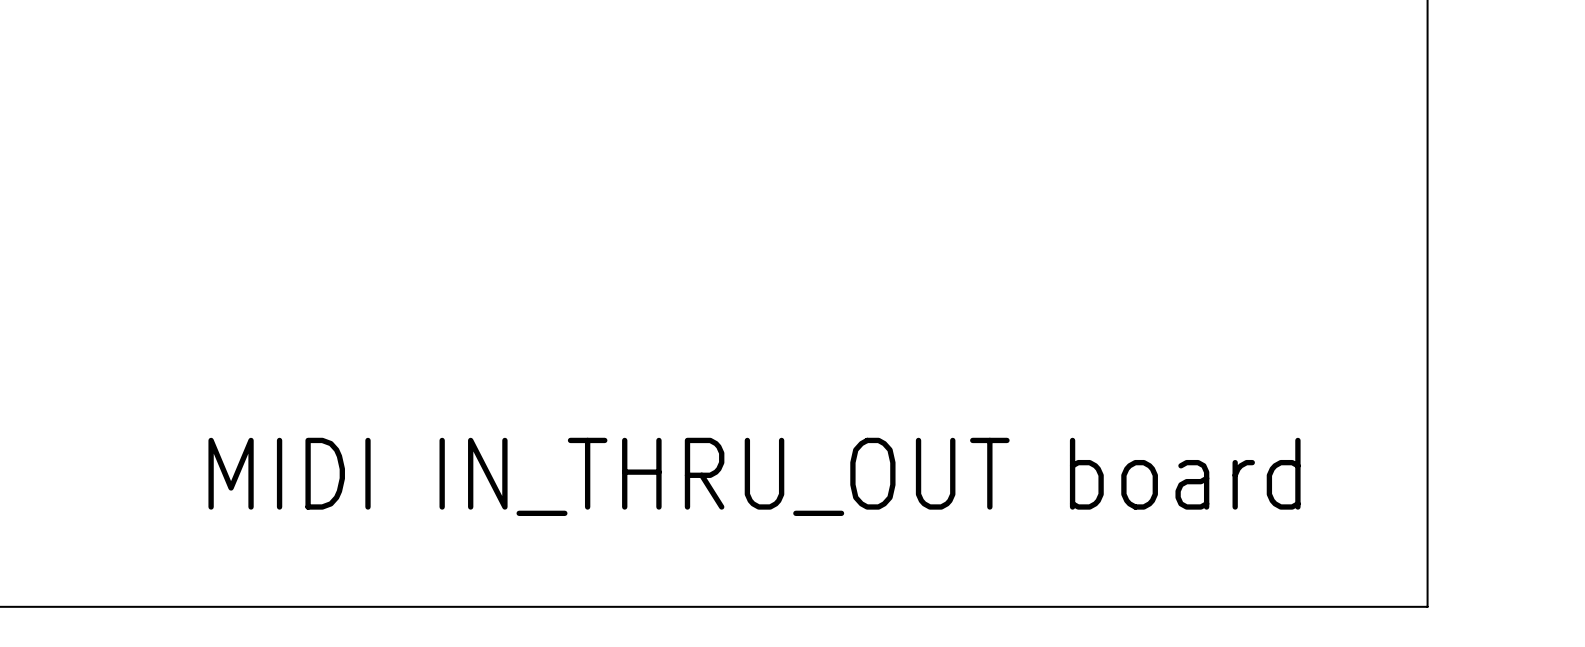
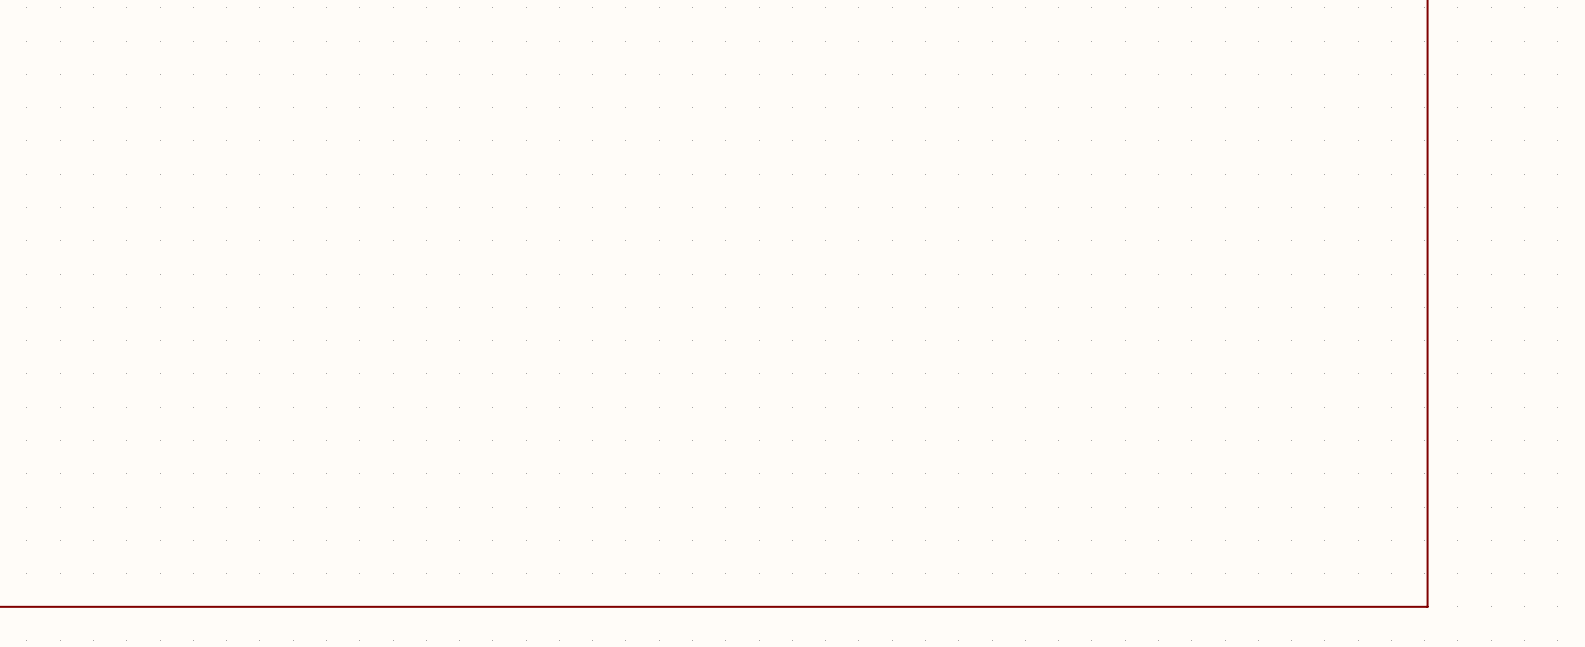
text: MIDI IN_THRU_OUT board (754, 476) -> none

